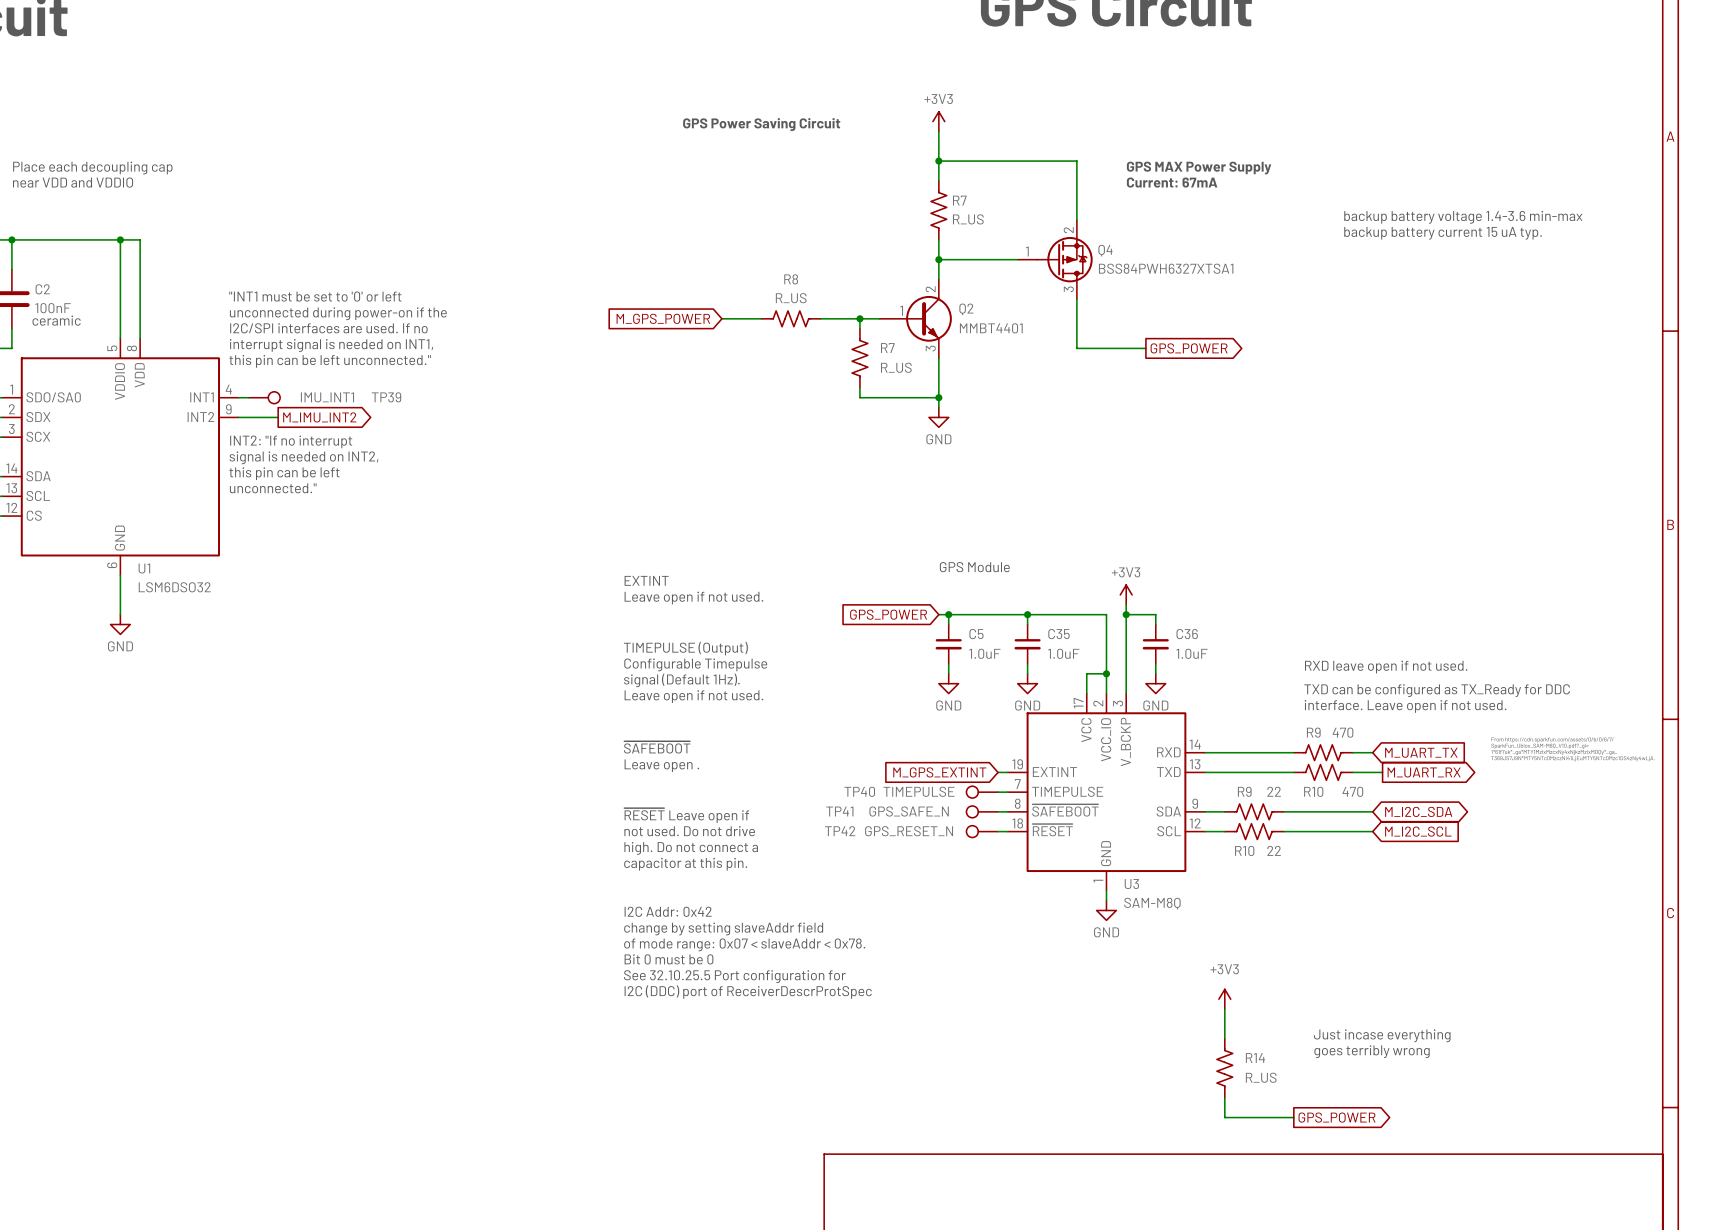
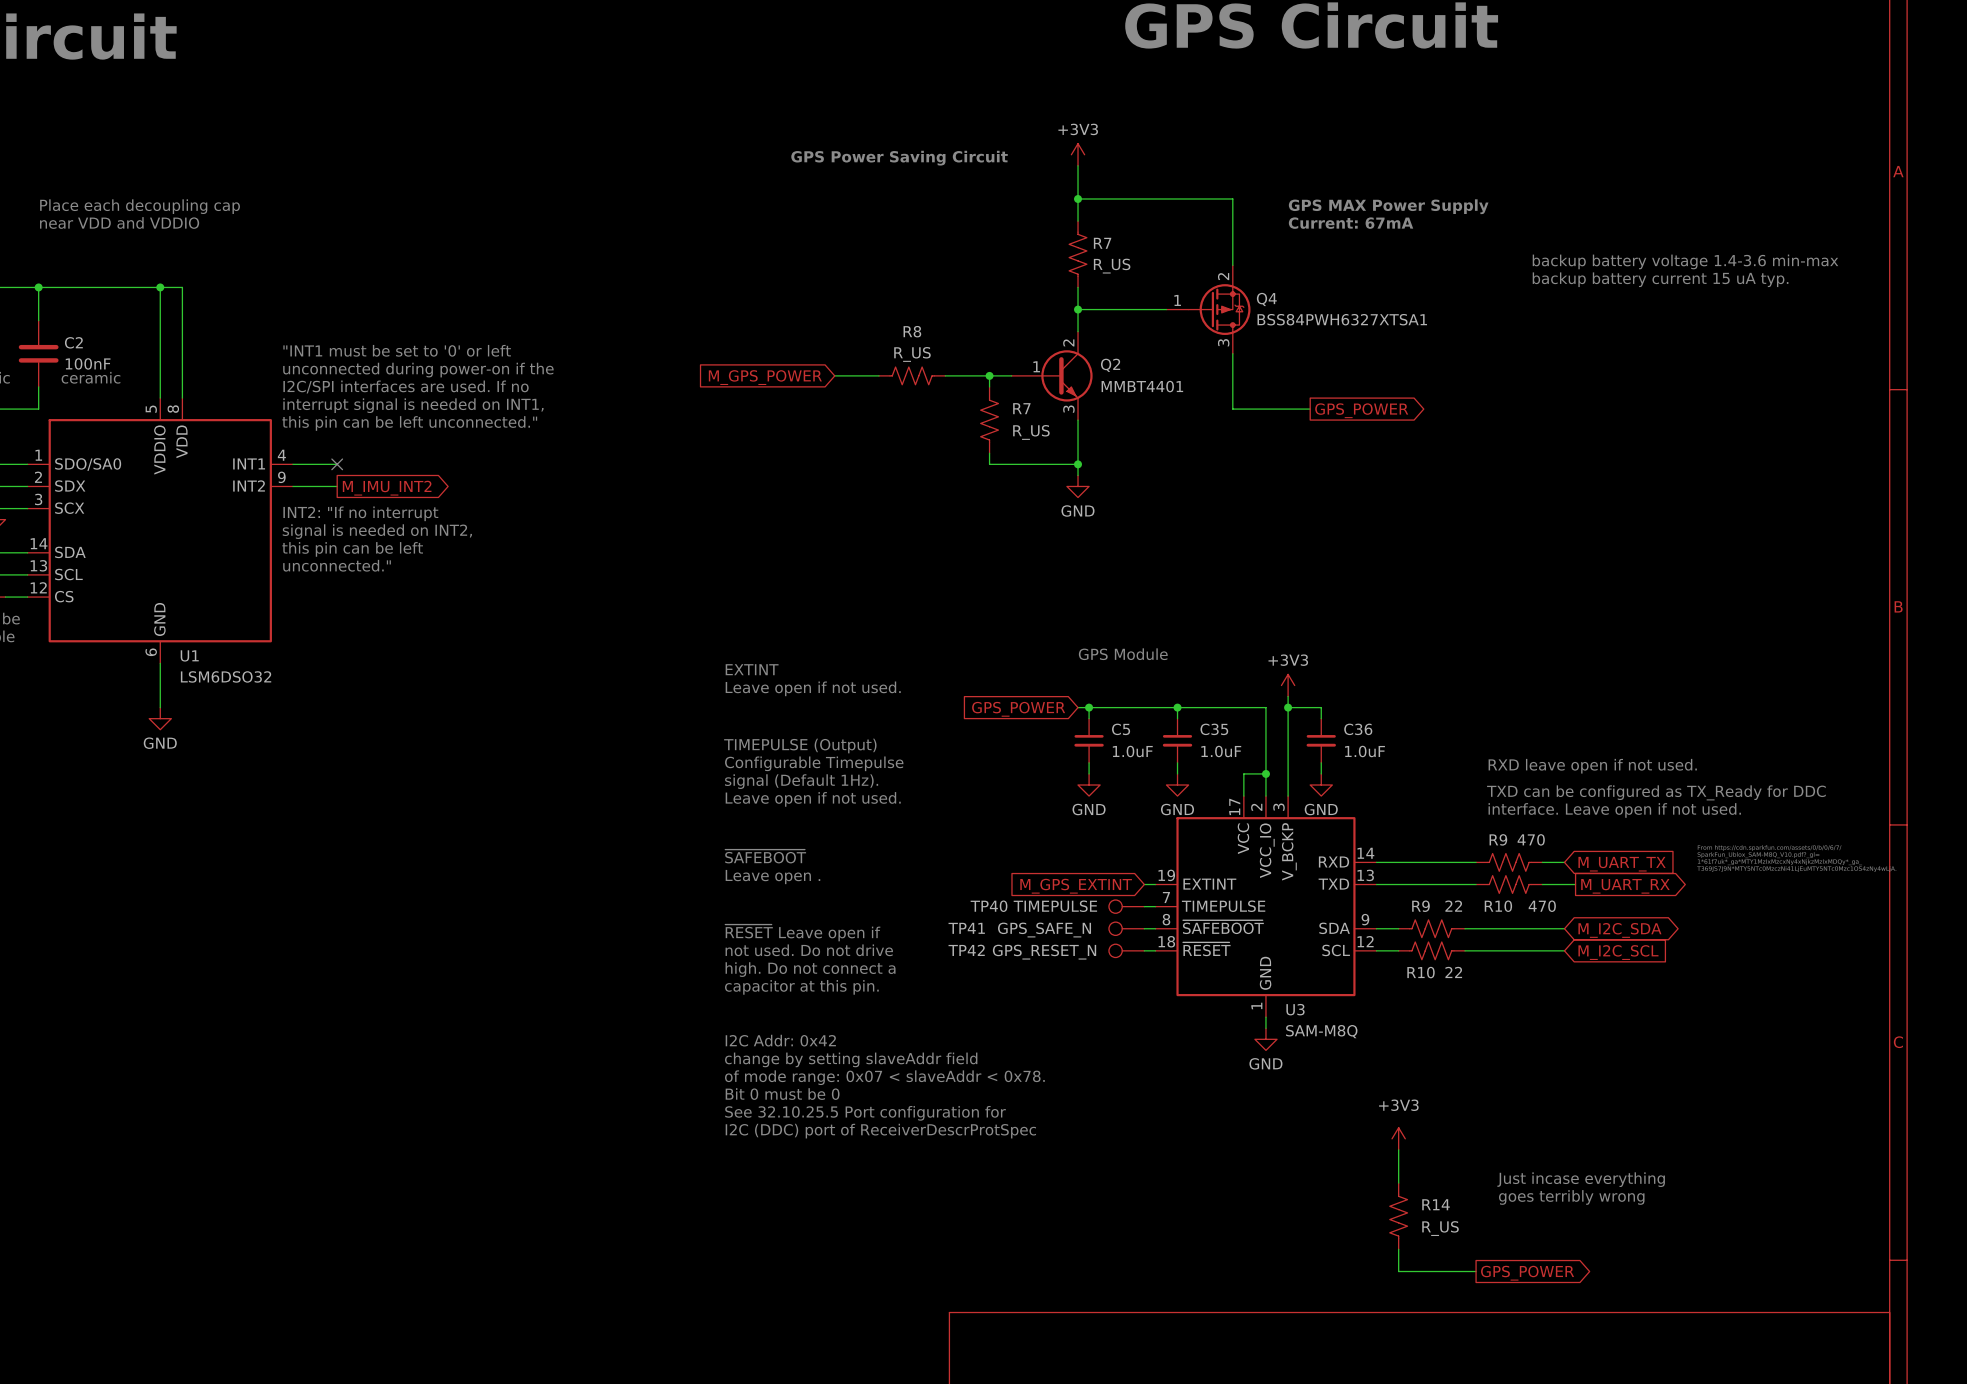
TP39: IMU_INT1 (264, 397) -> none
no-connect mark: none -> (337, 464)

